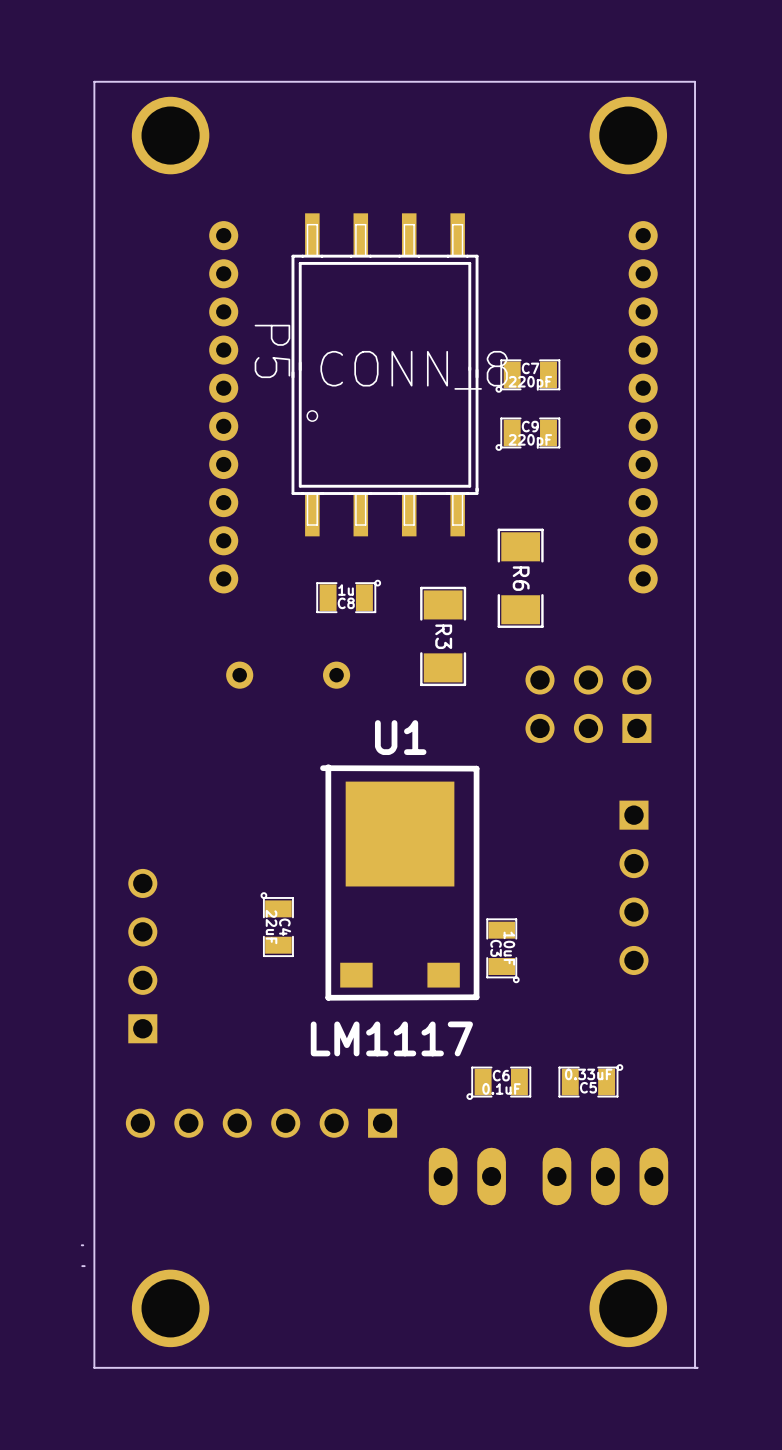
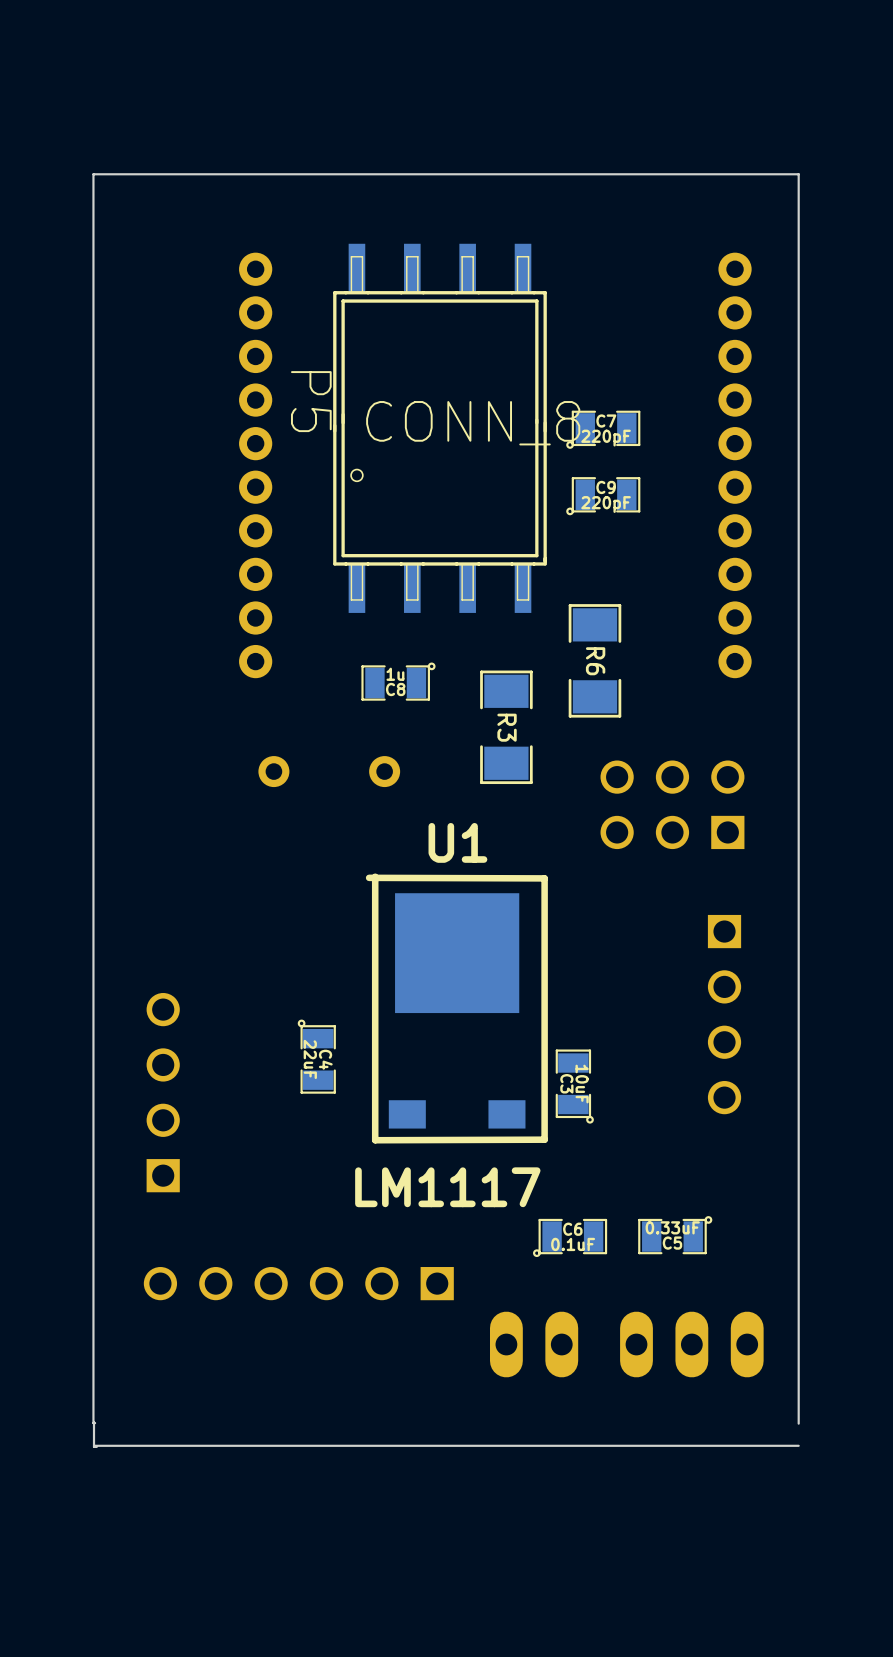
part: (170, 135) -> none
part: (628, 135) -> none
board edge: none -> (94, 1422) (94, 1446)
board edge: none -> (93, 1423) (93, 174) (798, 174) (798, 1423)
board edge: none -> (798, 1445) (95, 1445)
part: (170, 1308) -> none
part: (628, 1308) -> none
board edge: (697, 1367) (94, 1367) (94, 81) (695, 81) (695, 1367) -> none

